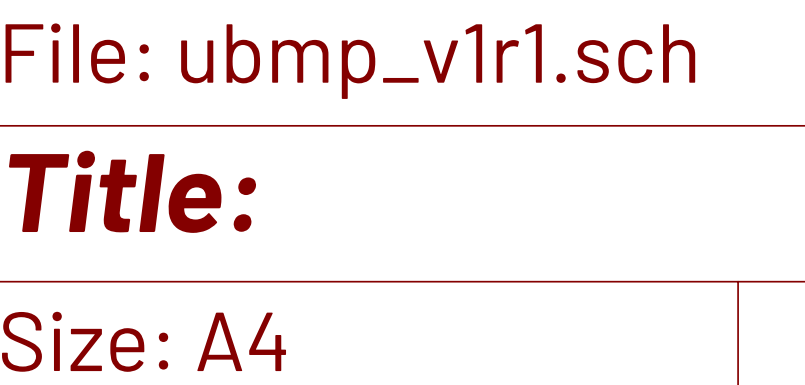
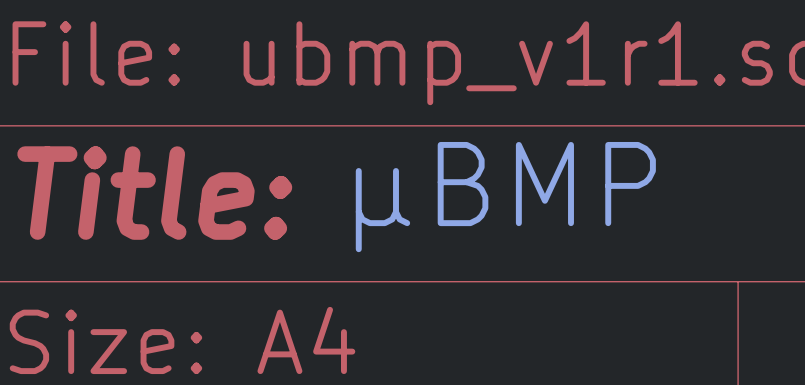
text: none -> µBMP (505, 197)

